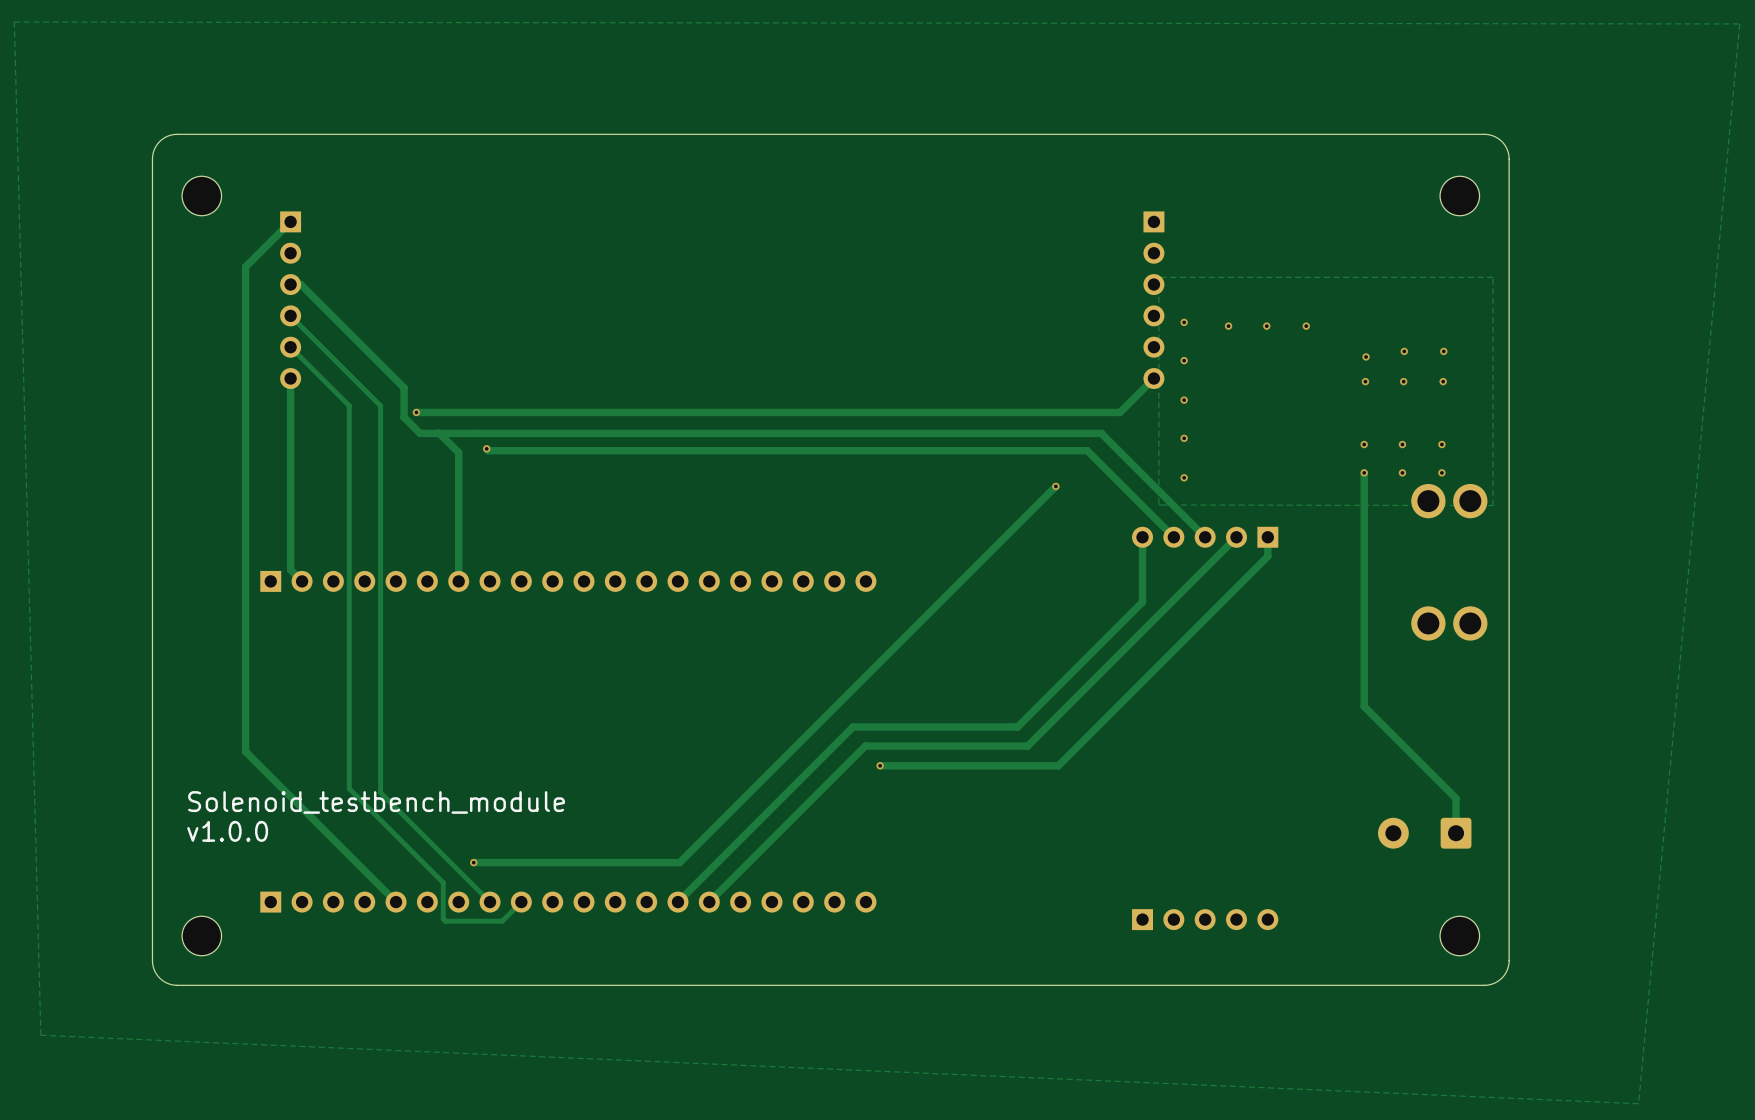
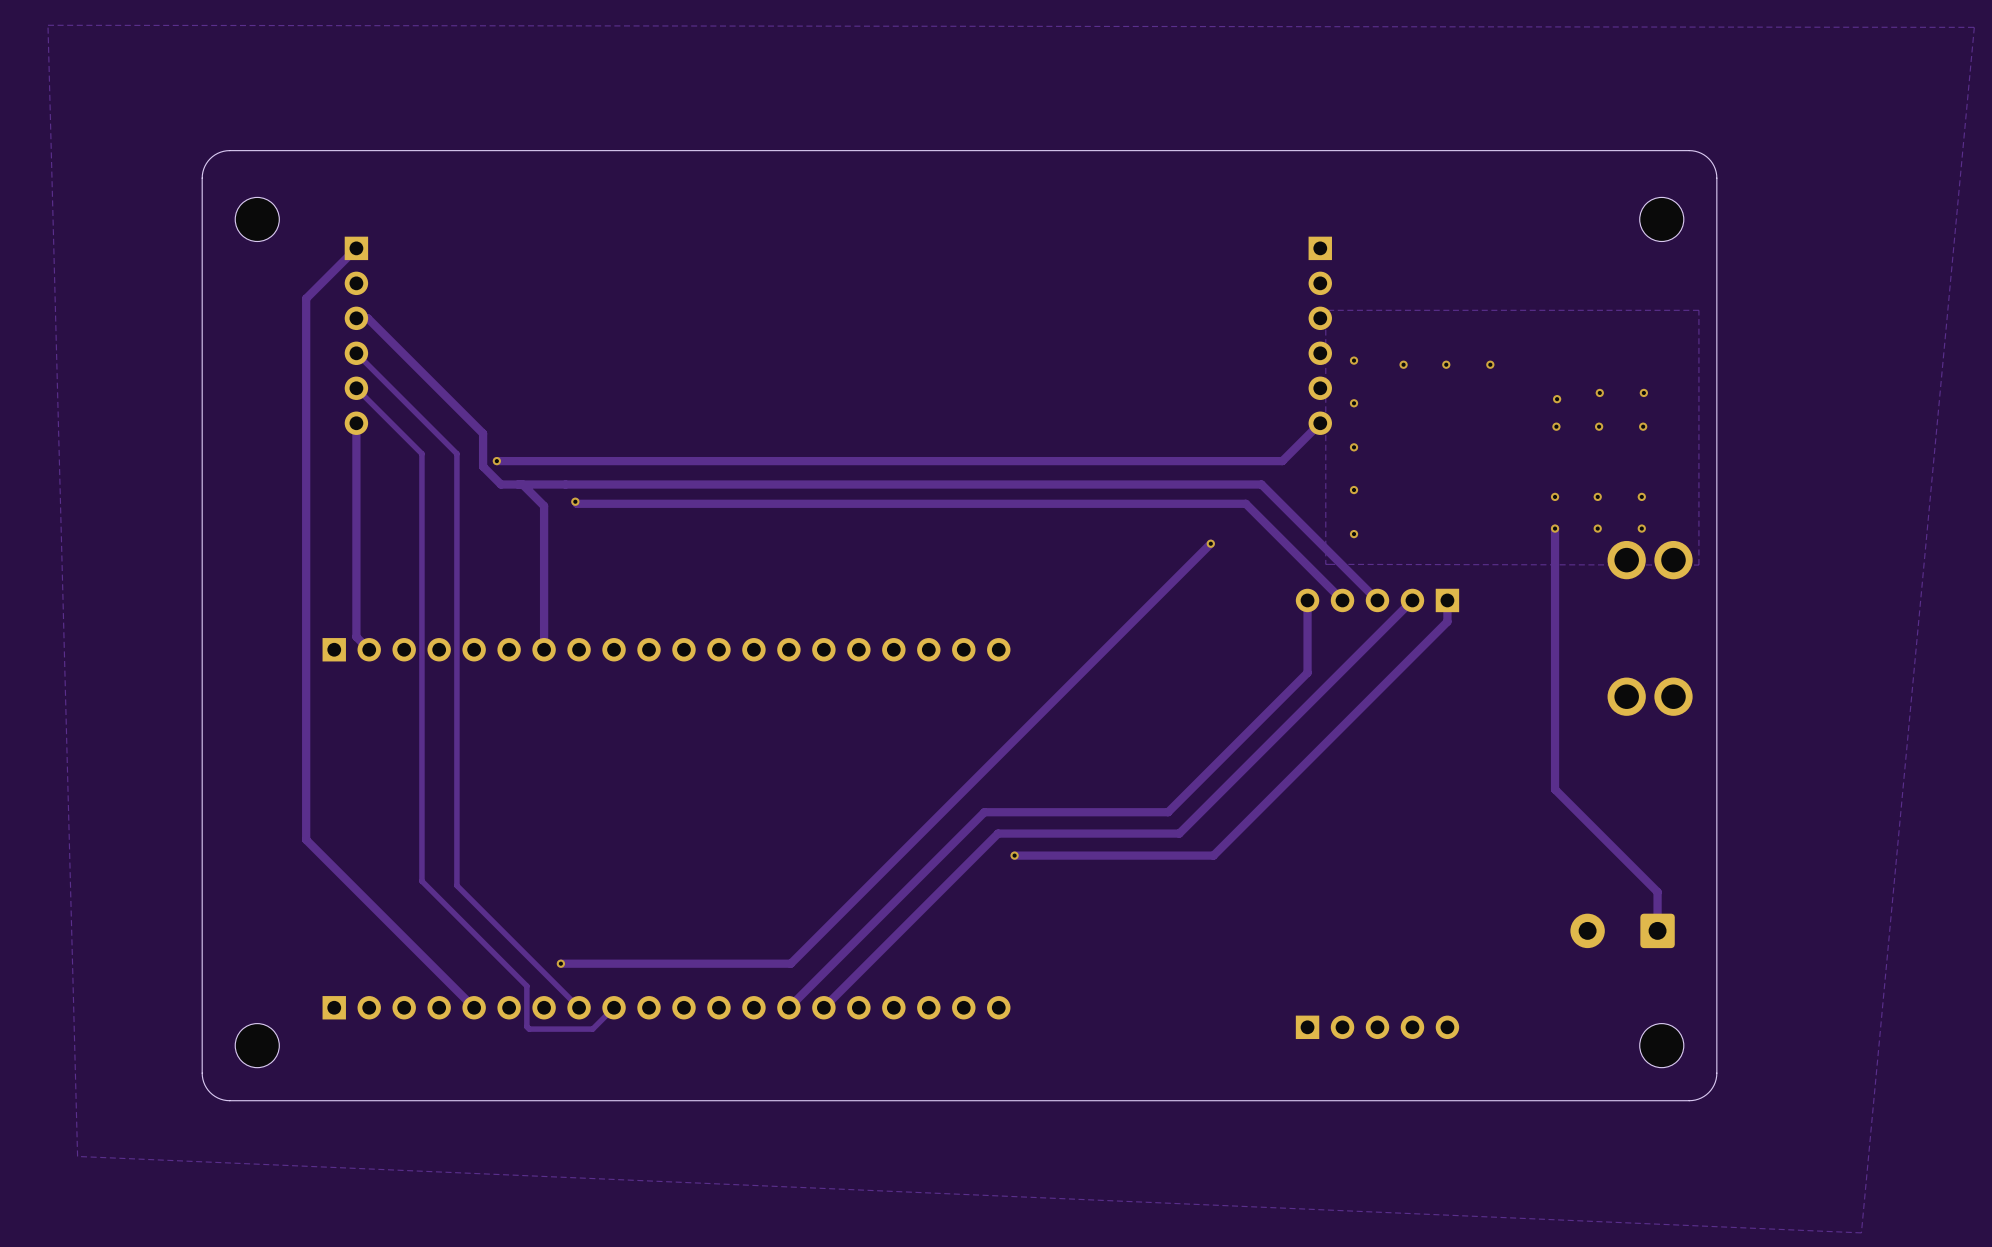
text: Solenoid_testbench_module (376, 802) -> none
text: v1.0.0 (227, 831) -> none

